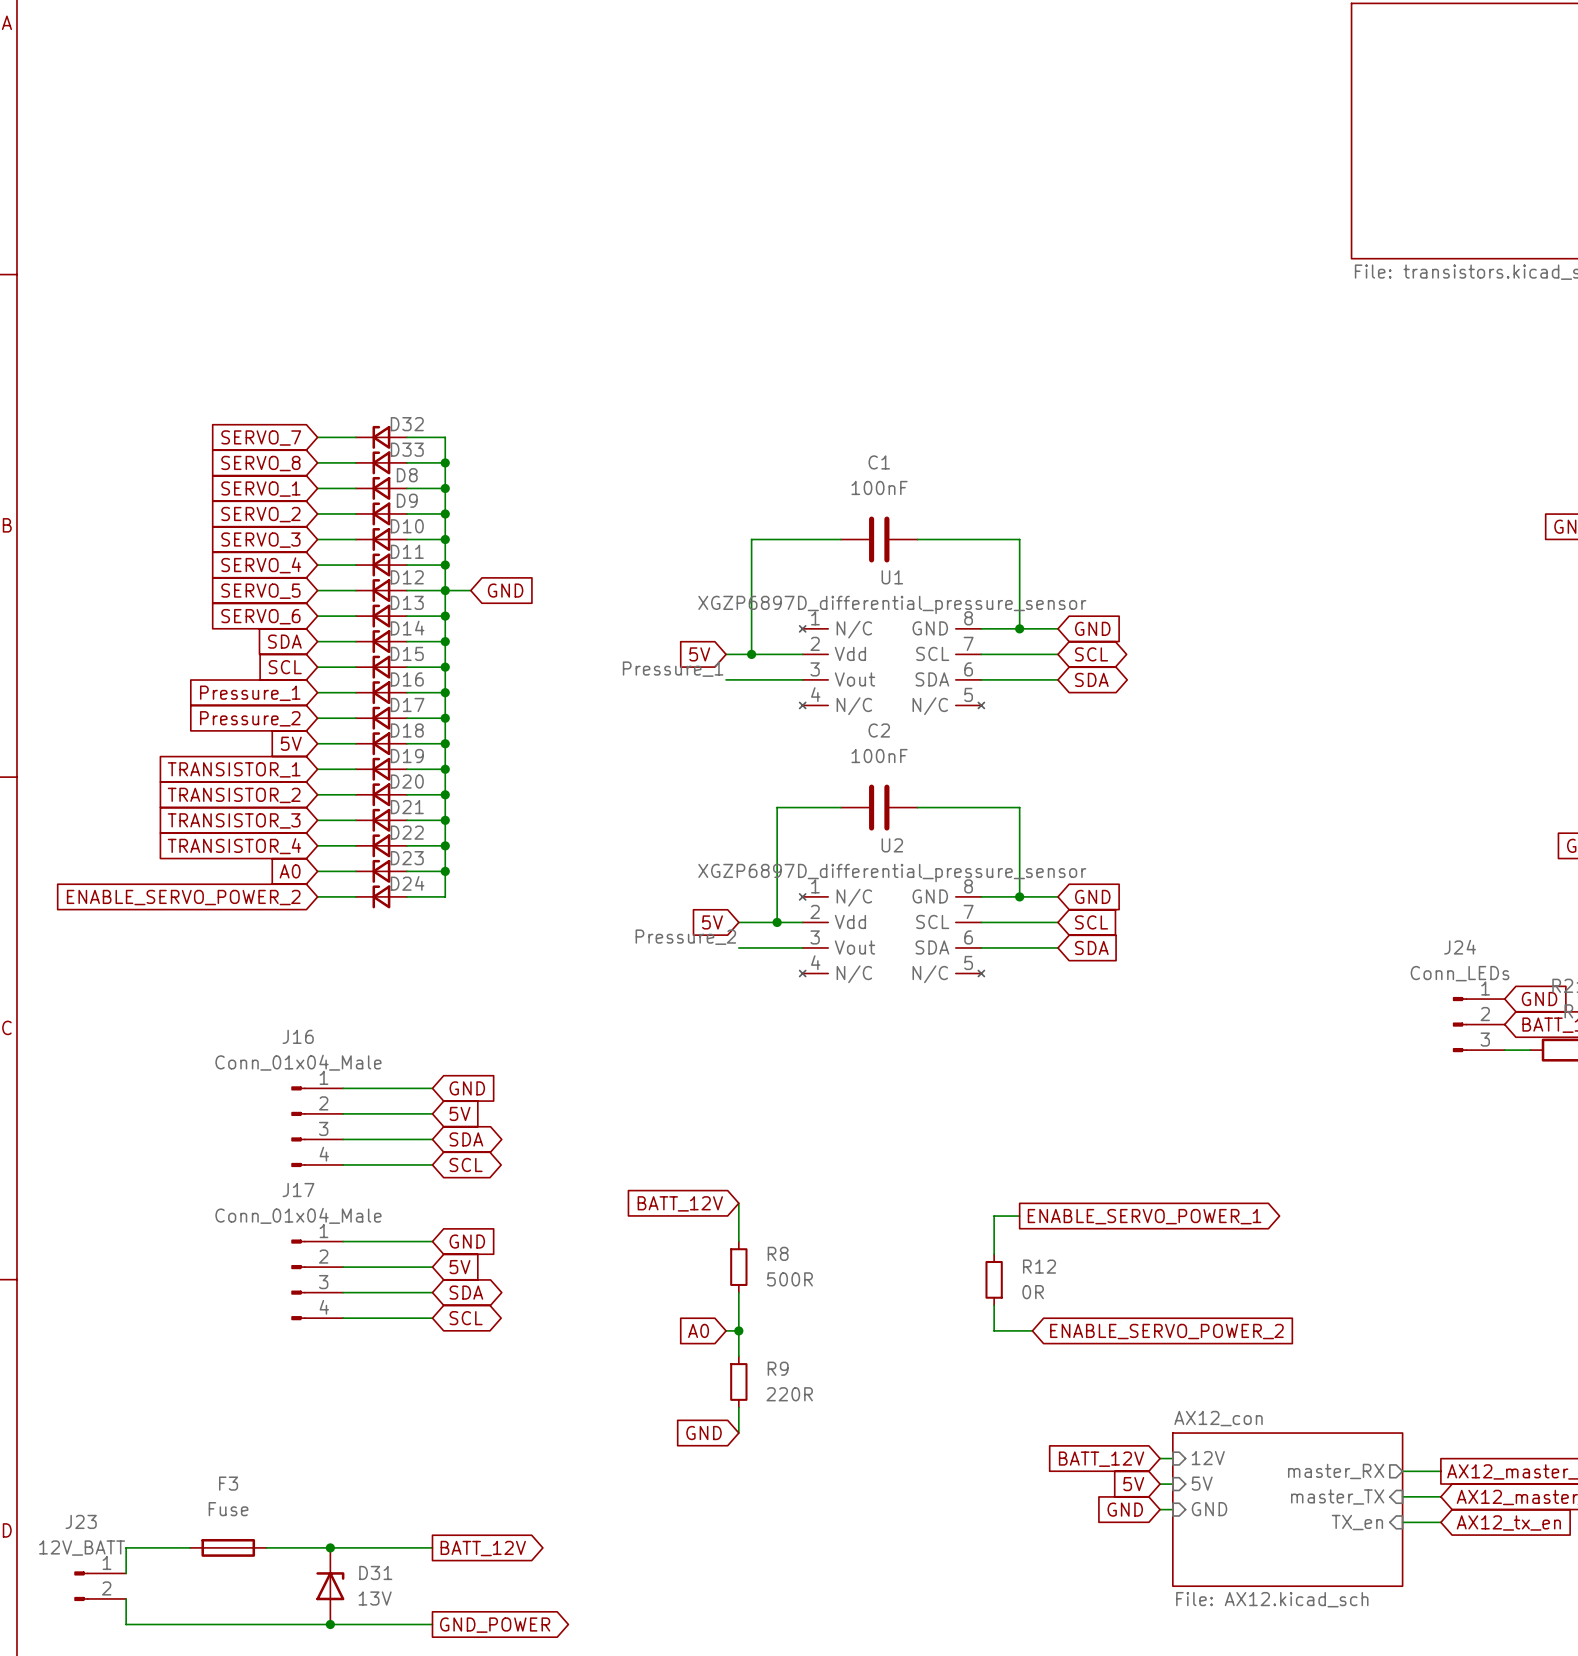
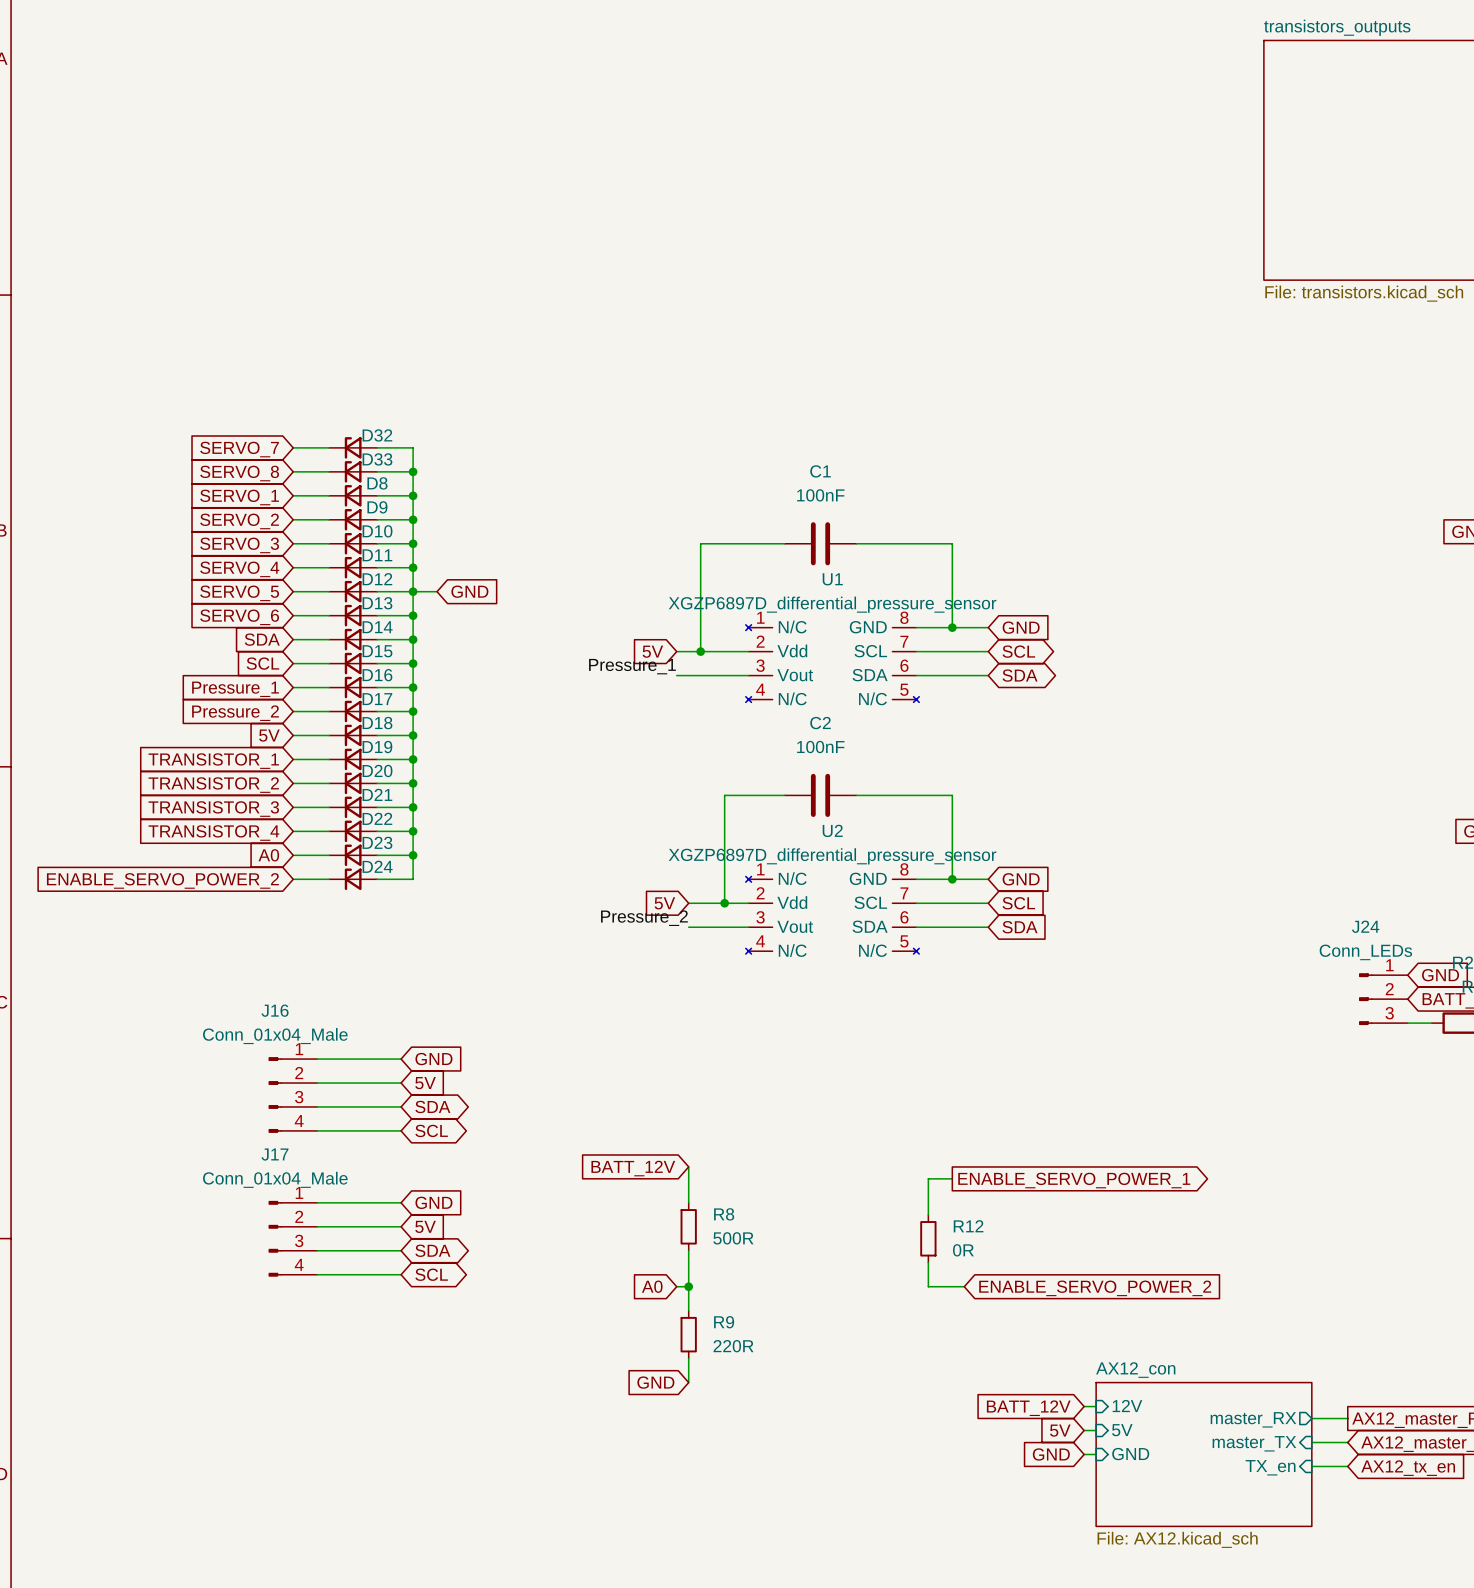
wire: (189, 1547) (126, 1547) (126, 1573) -> none
F3: Fuse (228, 1547) -> none
wire: (266, 1547) (432, 1547) -> none
junction: (330, 1547) -> none
global label: BATT_12V (483, 1548) -> none
J23: 12V_BATT (100, 1586) -> none
D31: 13V (330, 1586) -> none
wire: (126, 1598) (126, 1624) (432, 1624) -> none
junction: (330, 1624) -> none
global label: GND_POWER (495, 1625) -> none

